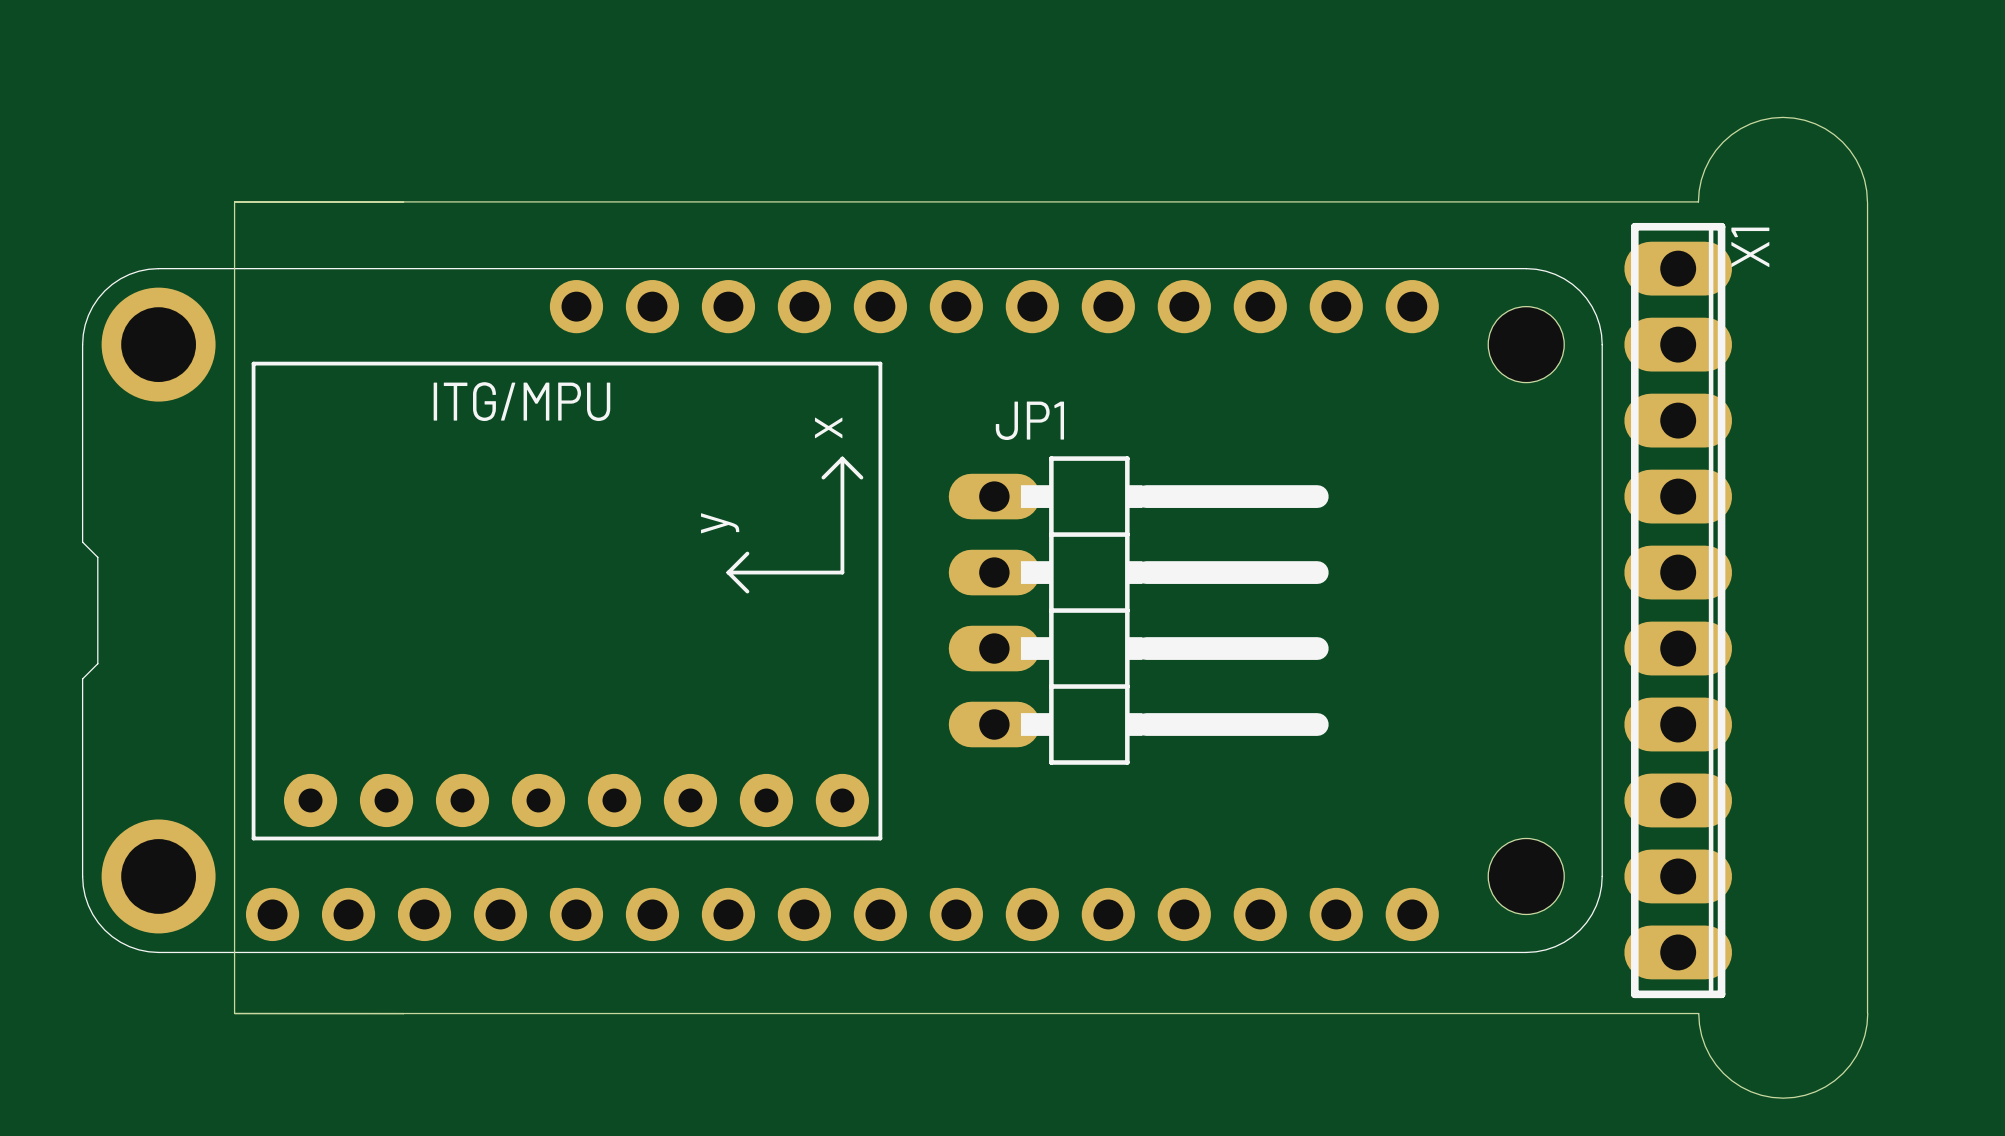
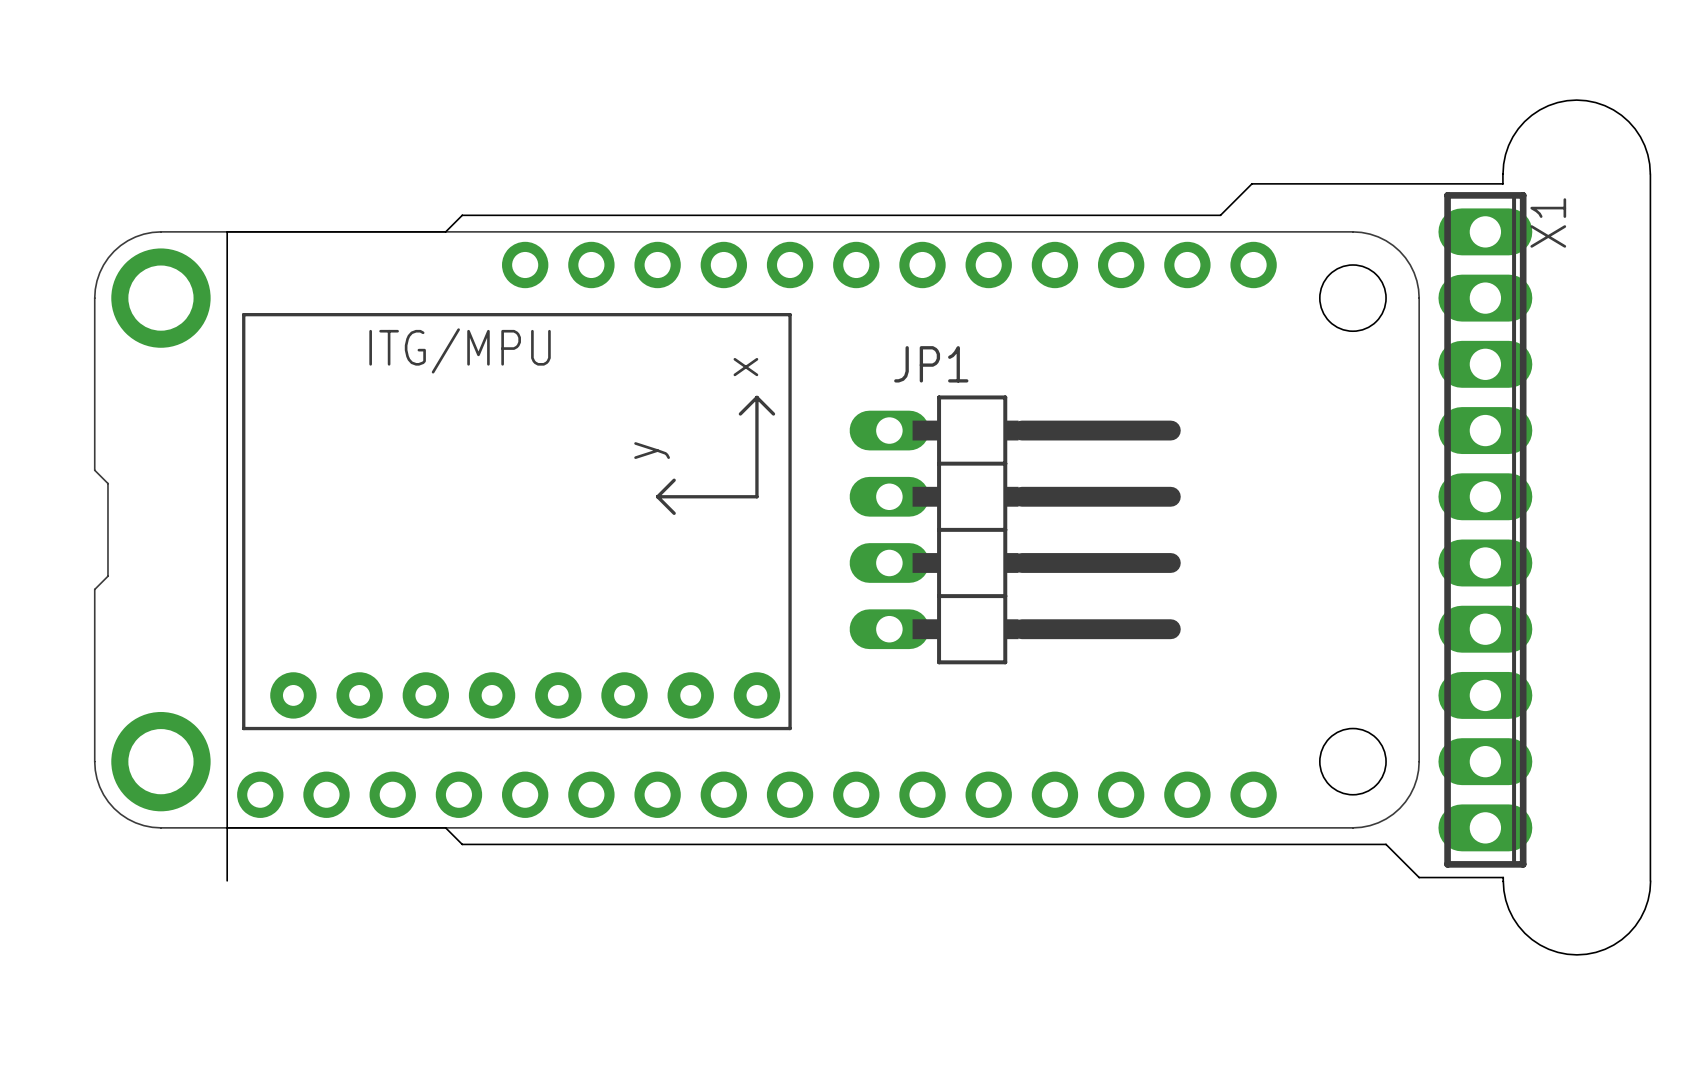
board edge: (234, 201) (1698, 201) -> (227, 231) (445, 231) (462, 215) (1220, 215) (1251, 183) (1502, 183) (1502, 173)
board edge: (234, 202) (234, 268) -> none
board edge: (234, 1013) (1698, 1013) -> (227, 827) (445, 827) (462, 844) (1386, 844) (1419, 877) (1503, 877) (1503, 881)

